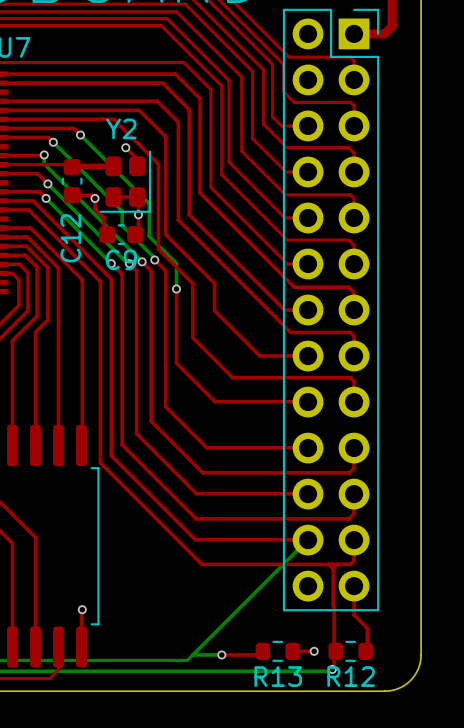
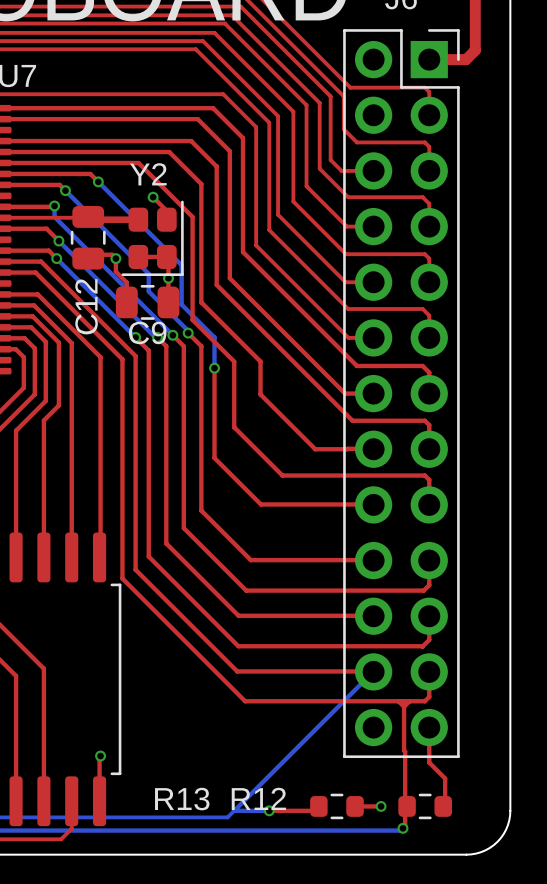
C12 footprint: [61, 159, 83, 204] -> [70, 205, 106, 270]
C9 footprint: [99, 224, 144, 245] -> [115, 284, 180, 320]
R13 name position: R13 (278, 676) -> R13 (182, 799)
R12 name position: R12 (351, 676) -> R12 (258, 798)

